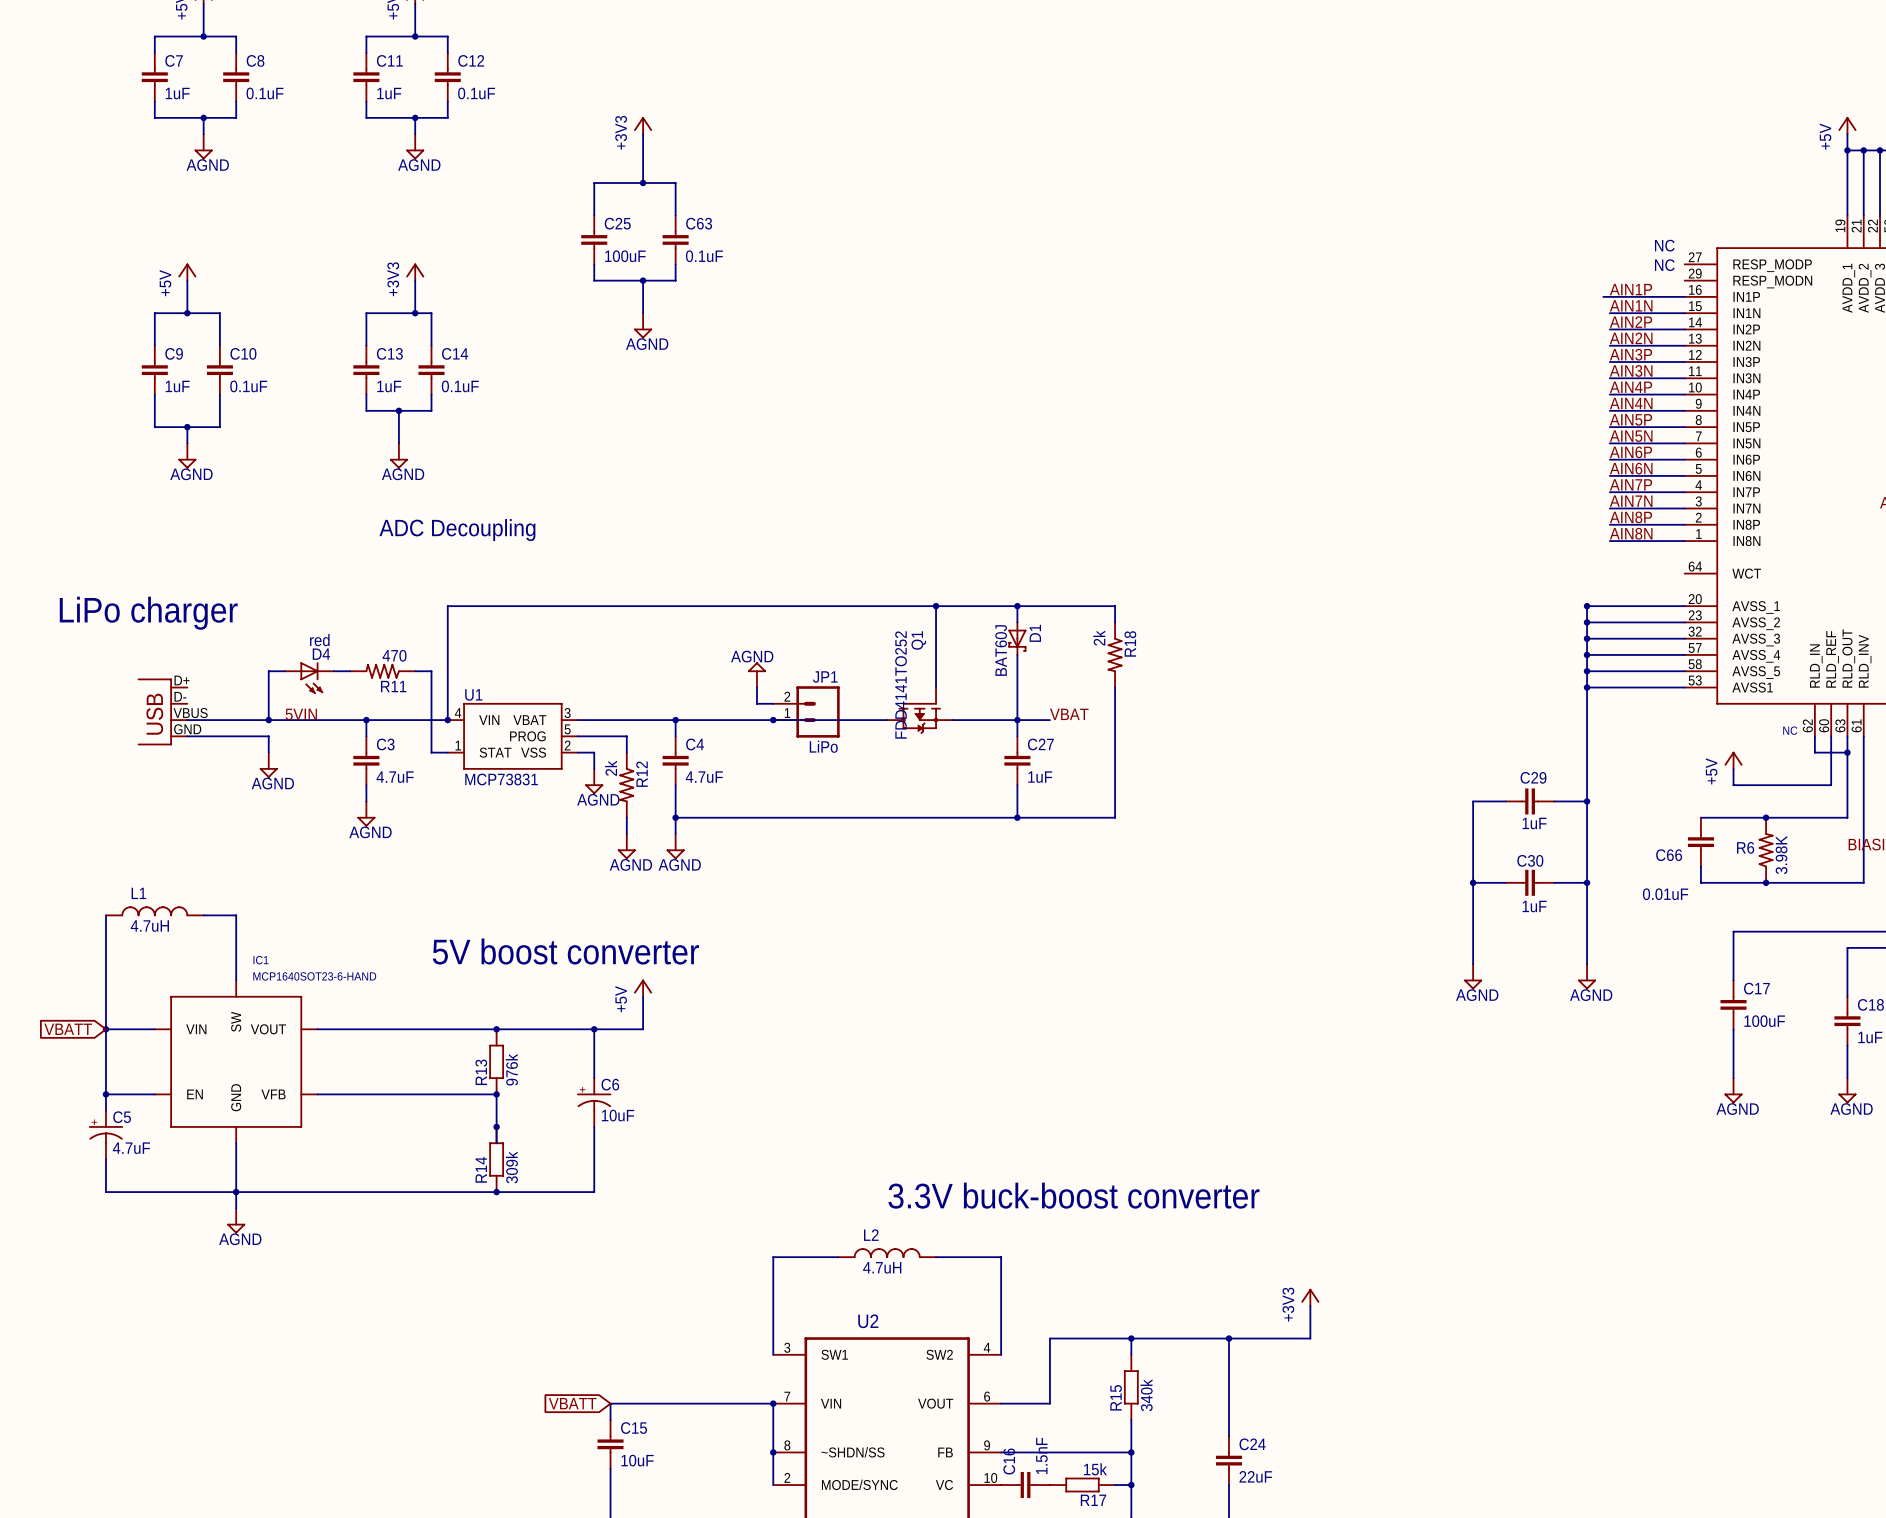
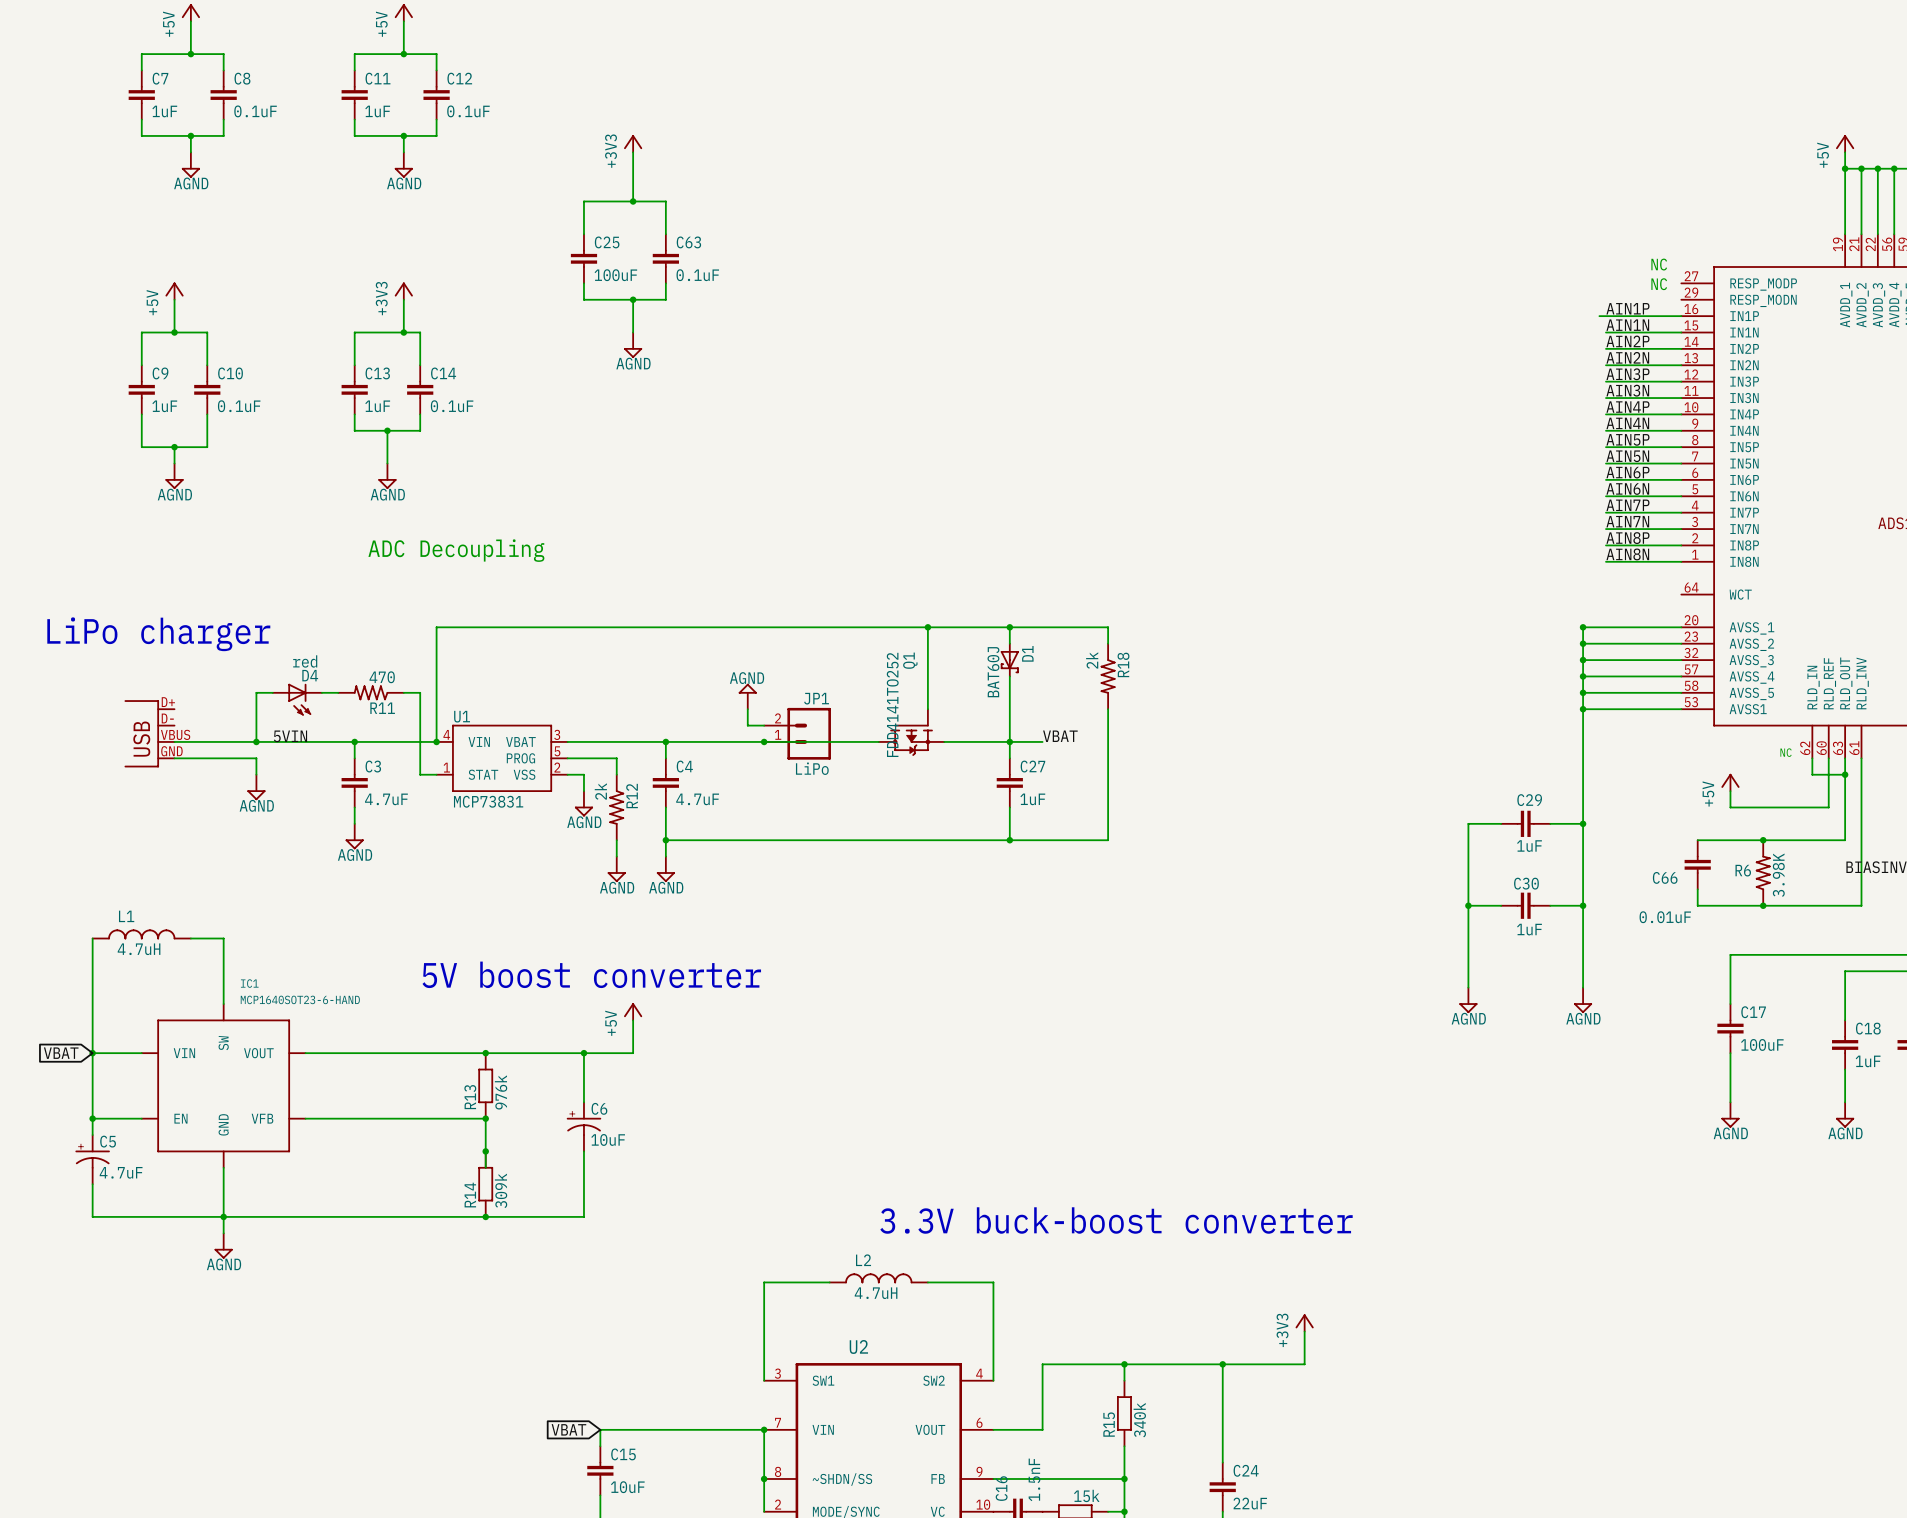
global label: VBATT (68, 1029) -> VBAT (61, 1053)
global label: VBATT (572, 1403) -> VBAT (568, 1429)

